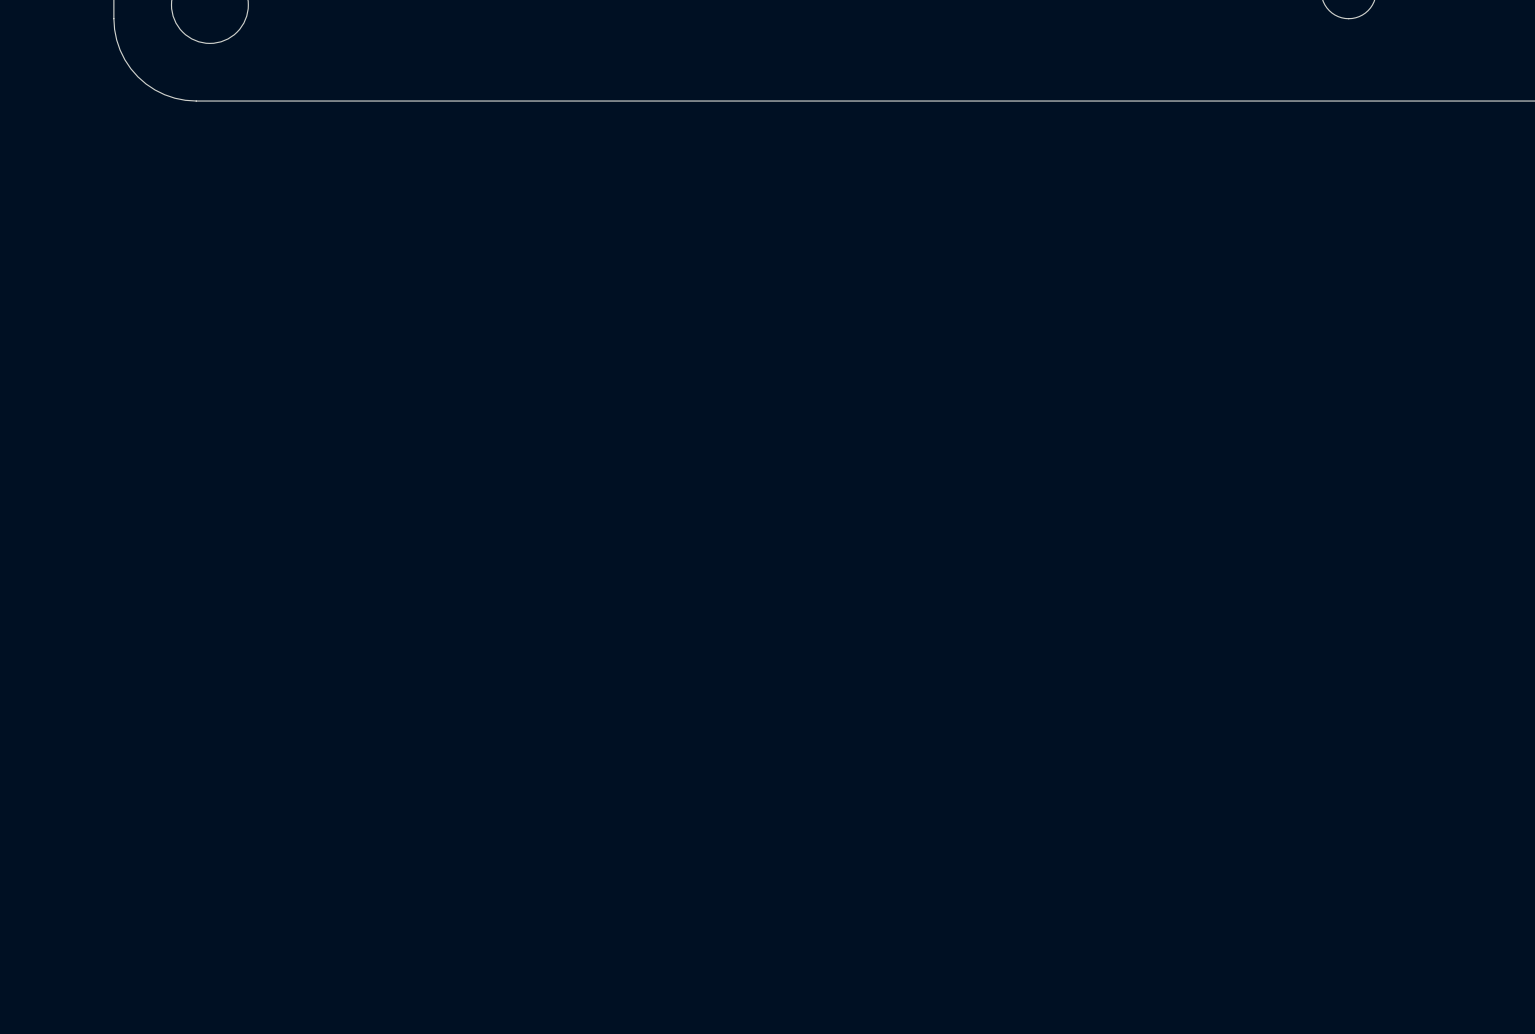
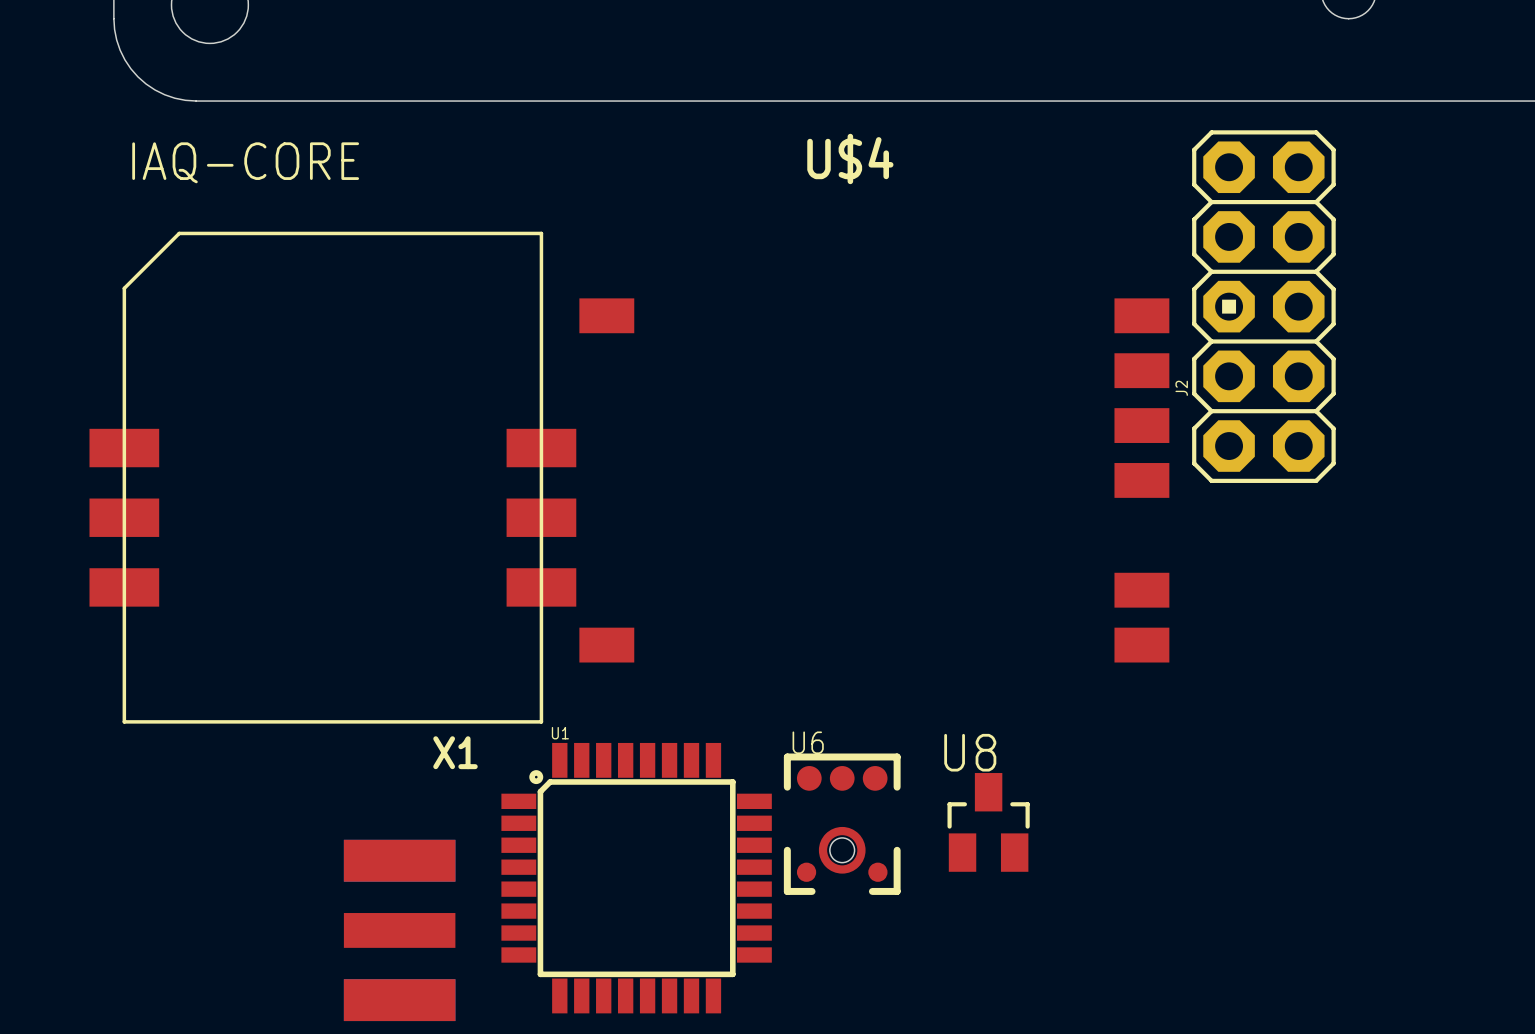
J2: none -> (1263, 306)
IAQ-CORE: none -> (332, 477)
U$4: none -> (874, 480)
U8: none -> (988, 822)
U6: none -> (842, 824)
U1: none -> (636, 878)
X1: none -> (399, 930)

